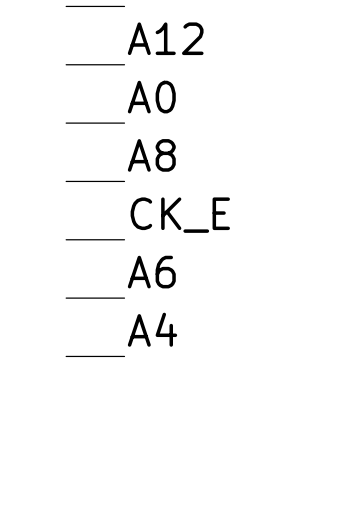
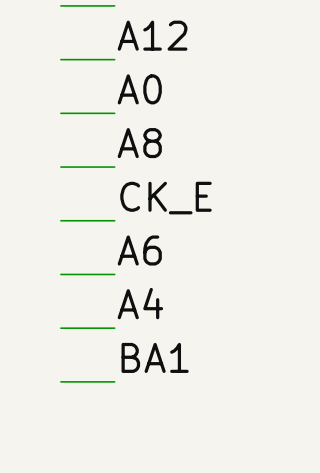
label: none -> BA1 (155, 357)
wire: none -> (60, 381) (114, 381)

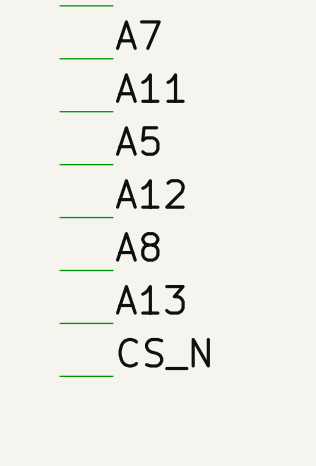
label: A12 (152, 35) -> A7 (138, 35)
label: A0 (139, 89) -> A11 (150, 88)
label: A8 (139, 143) -> A5 (137, 141)
label: CK_E (165, 198) -> A12 (150, 193)
label: A6 (139, 250) -> A8 (137, 246)
label: A4 (140, 303) -> A13 (150, 299)
label: BA1 (155, 357) -> CS_N (164, 354)

